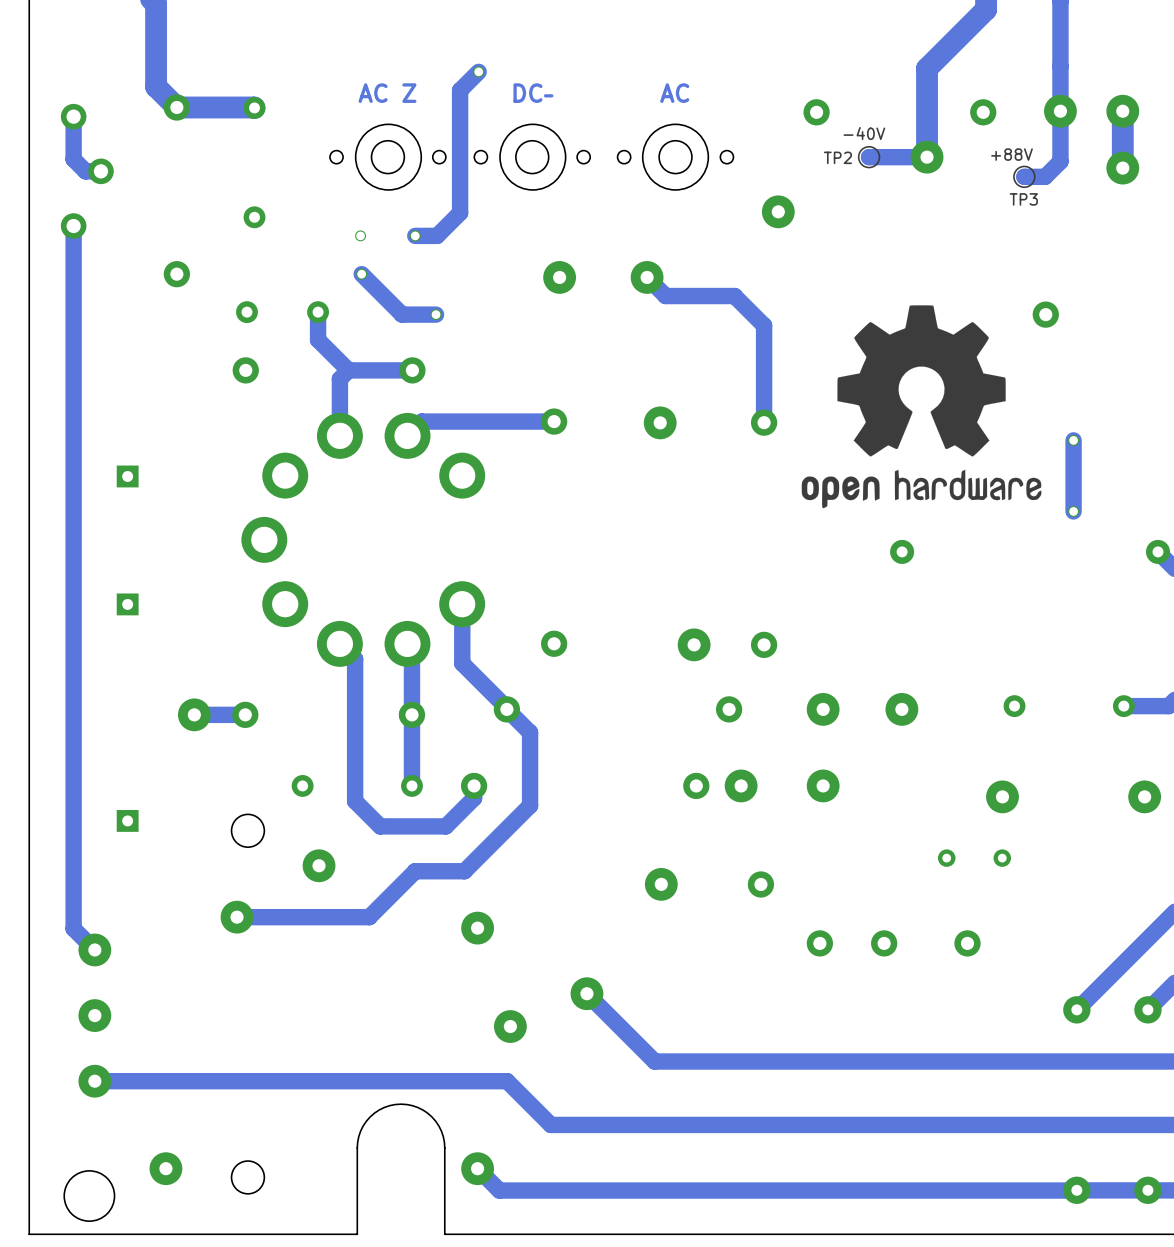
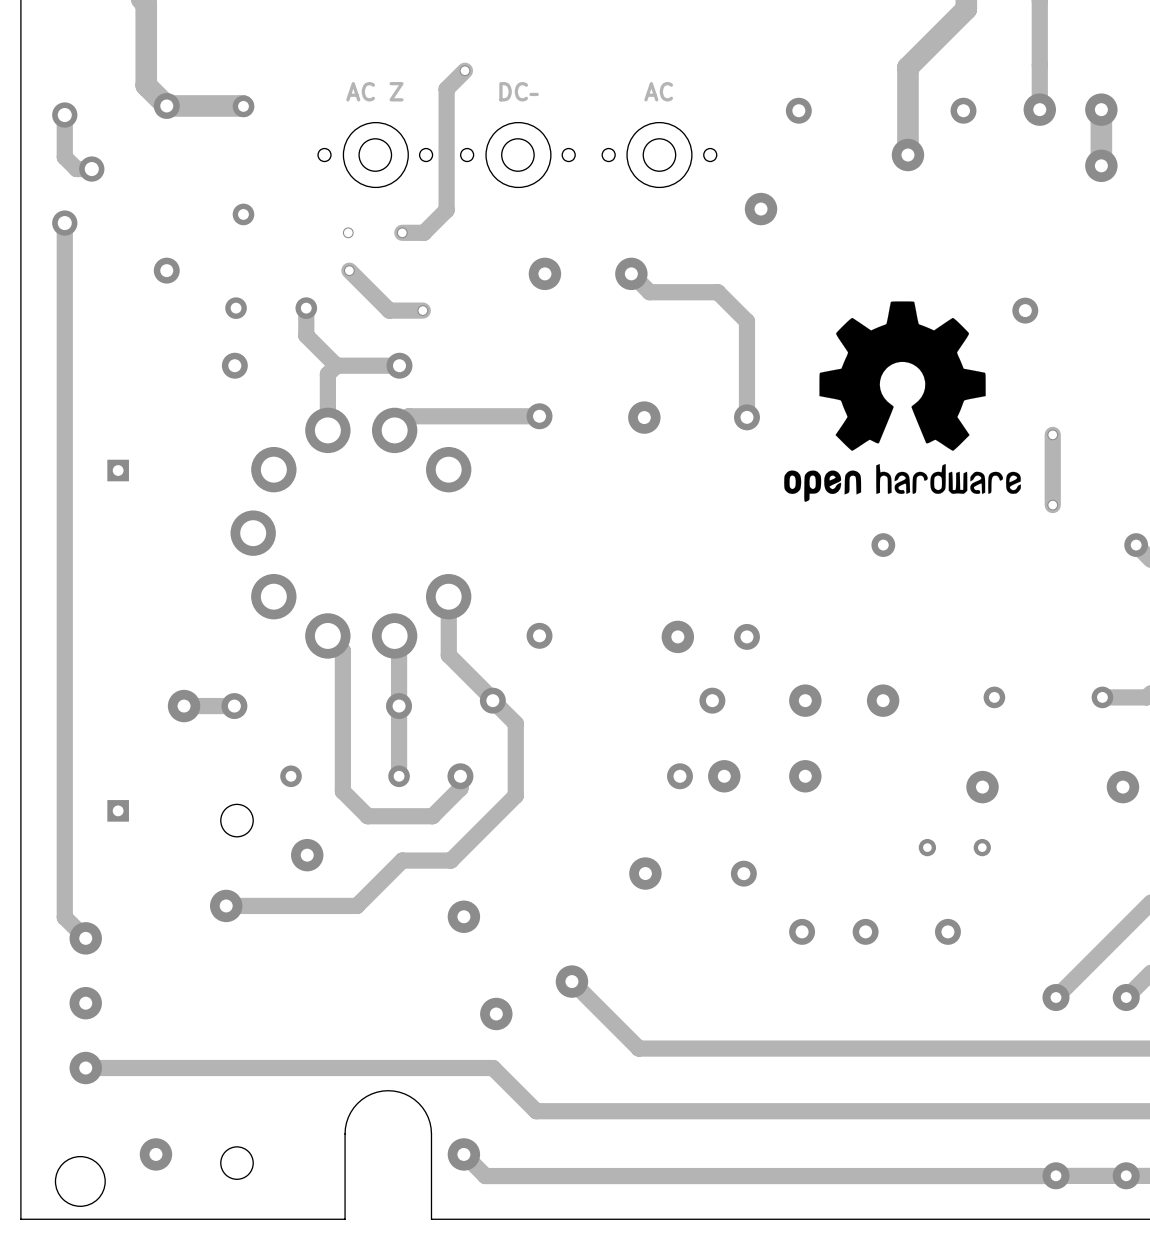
track: (1060, 111) (1060, 161) (1045, 176) (1024, 176) -> none
TP2: -40V (869, 157) -> none
track: (927, 157) (869, 157) -> none
TP3: +88V (1024, 176) -> none
part: (127, 604) -> none

